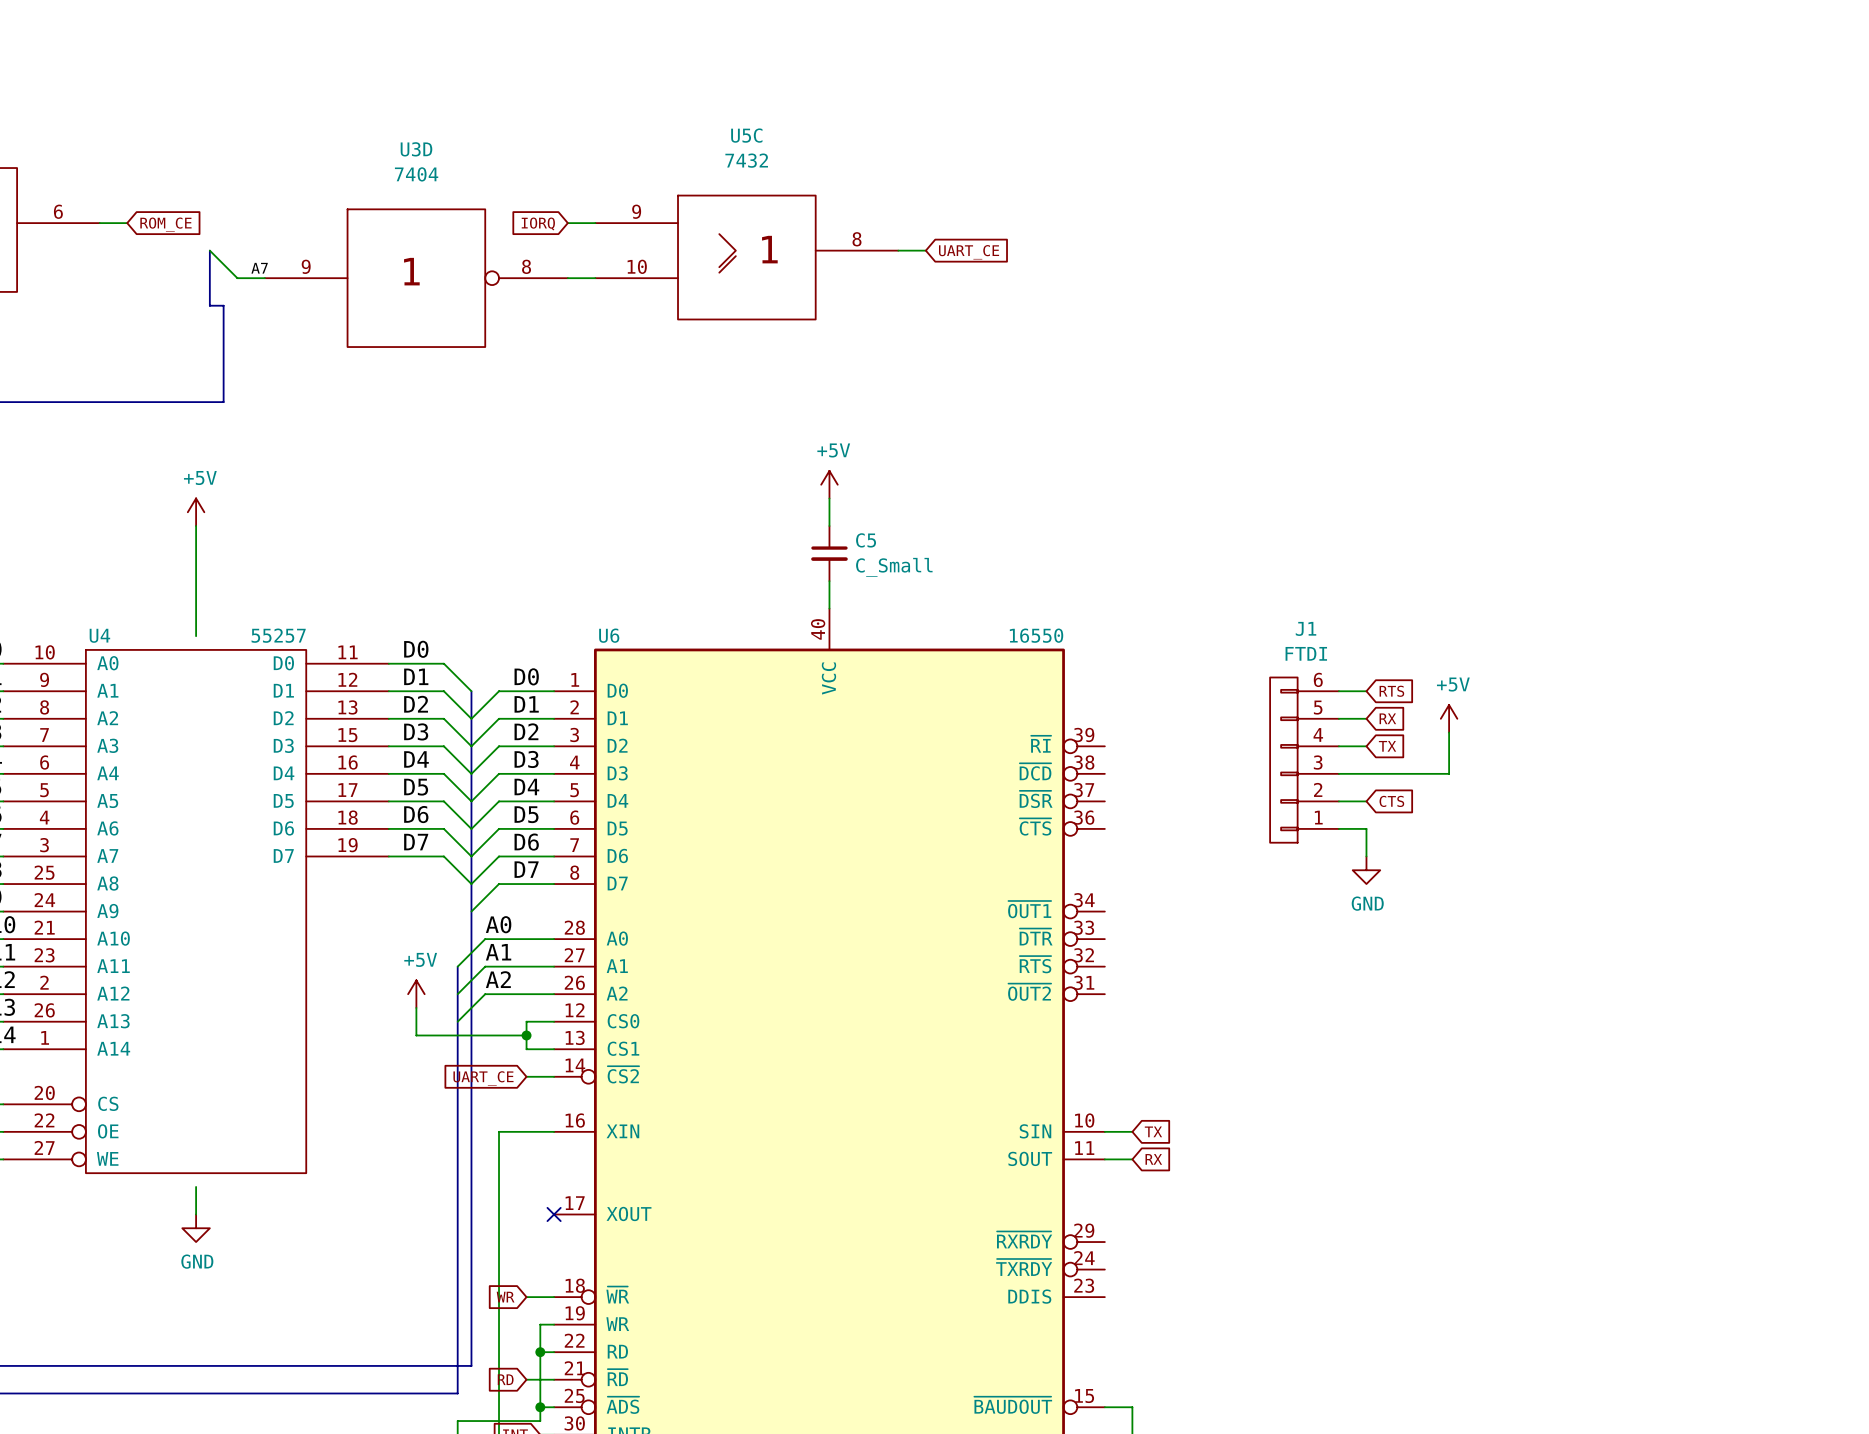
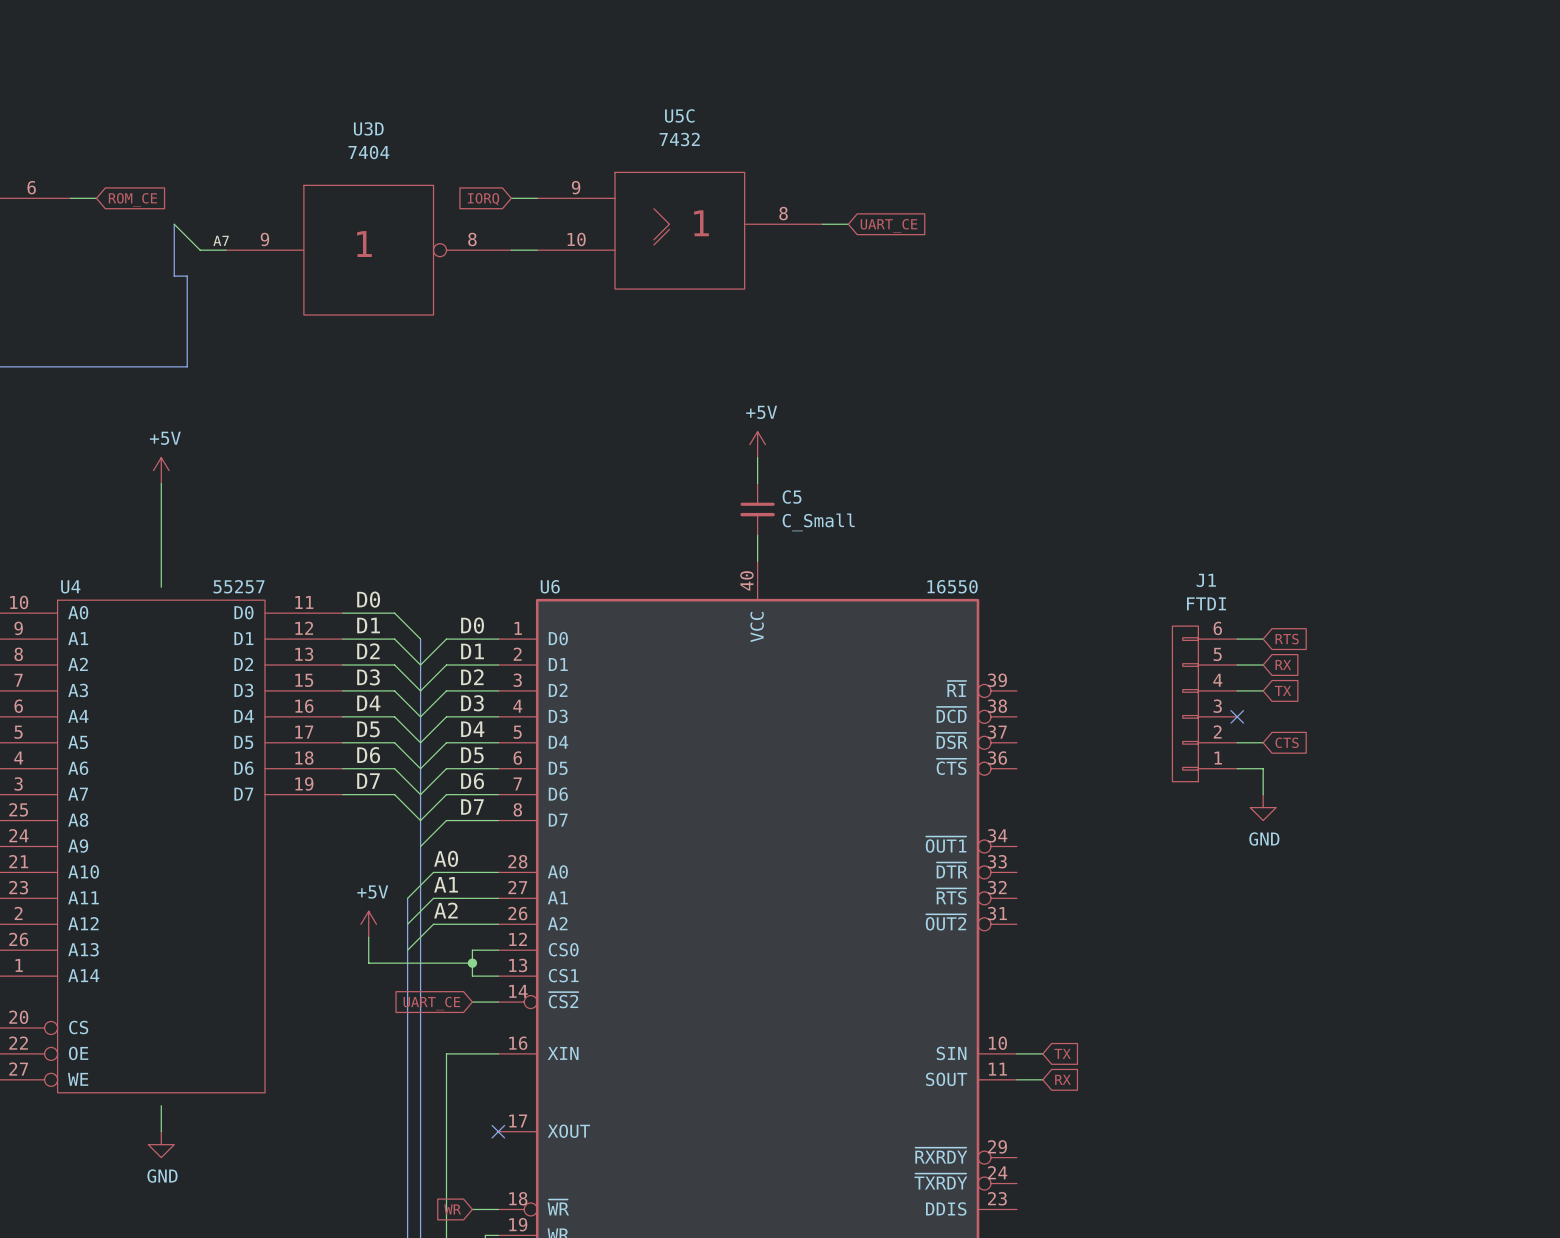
power symbol: +5V (1449, 718) -> none
wire: (1449, 732) (1449, 773) (1338, 773) -> none
no-connect mark: none -> (1237, 716)

